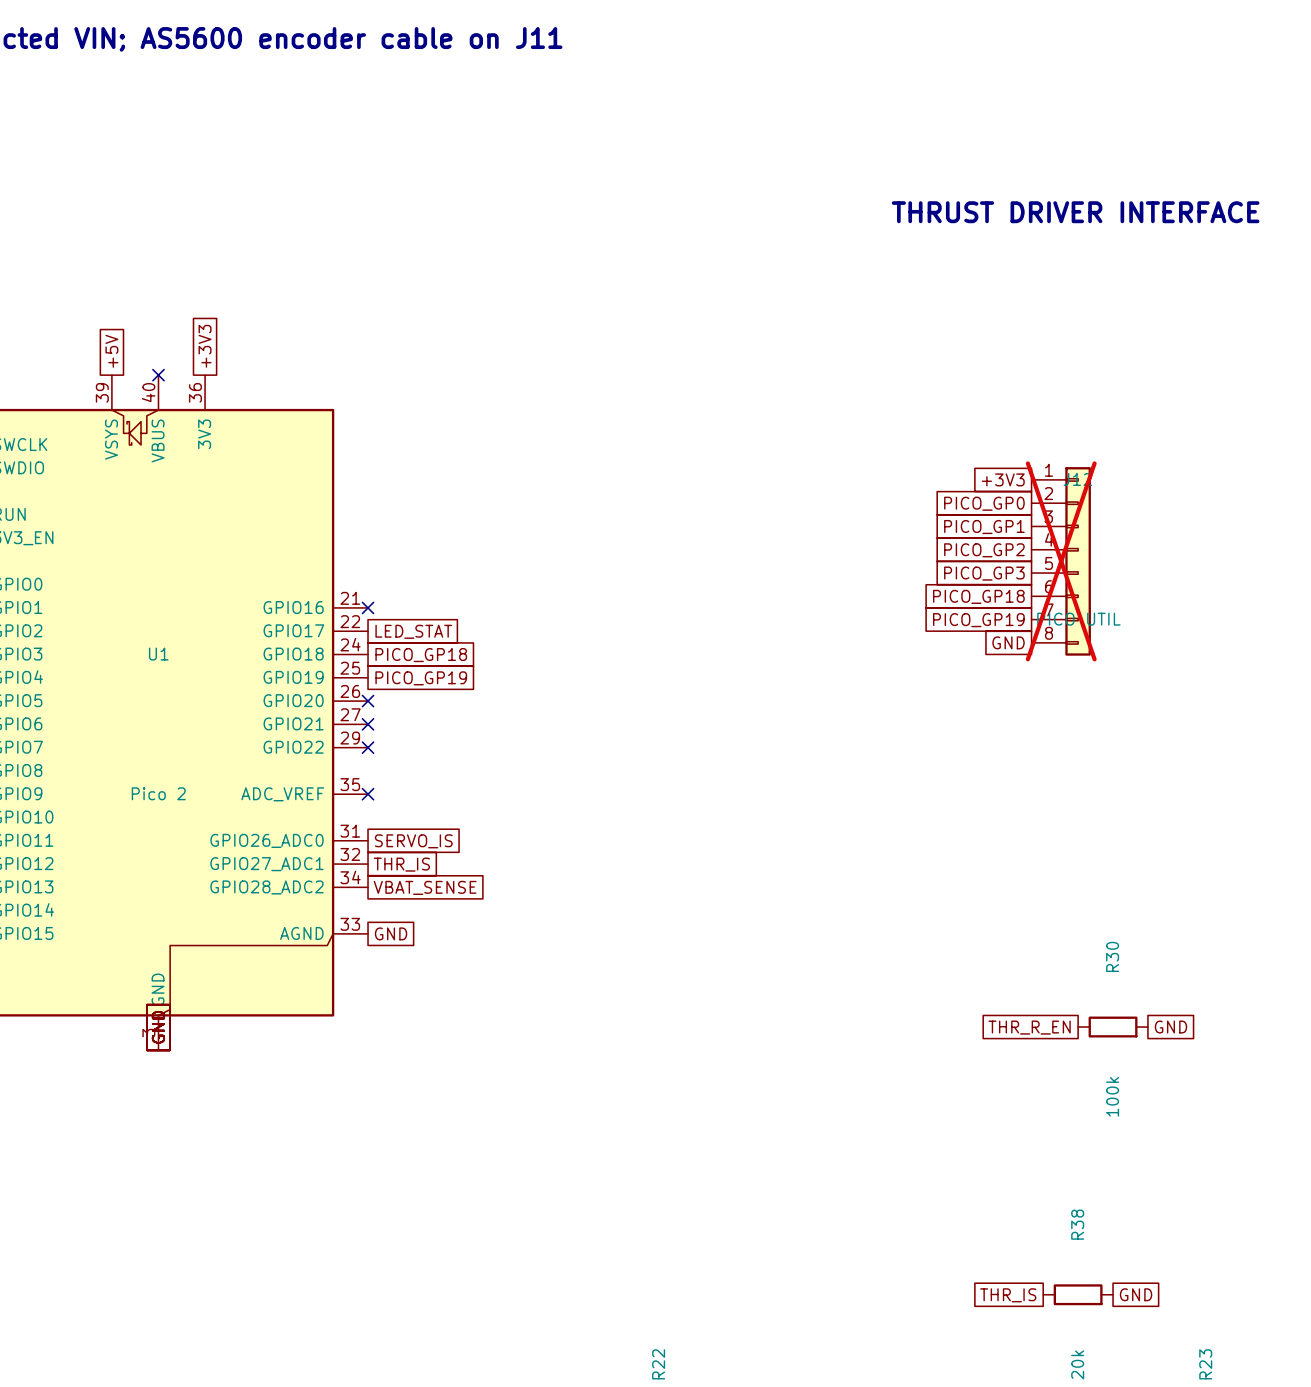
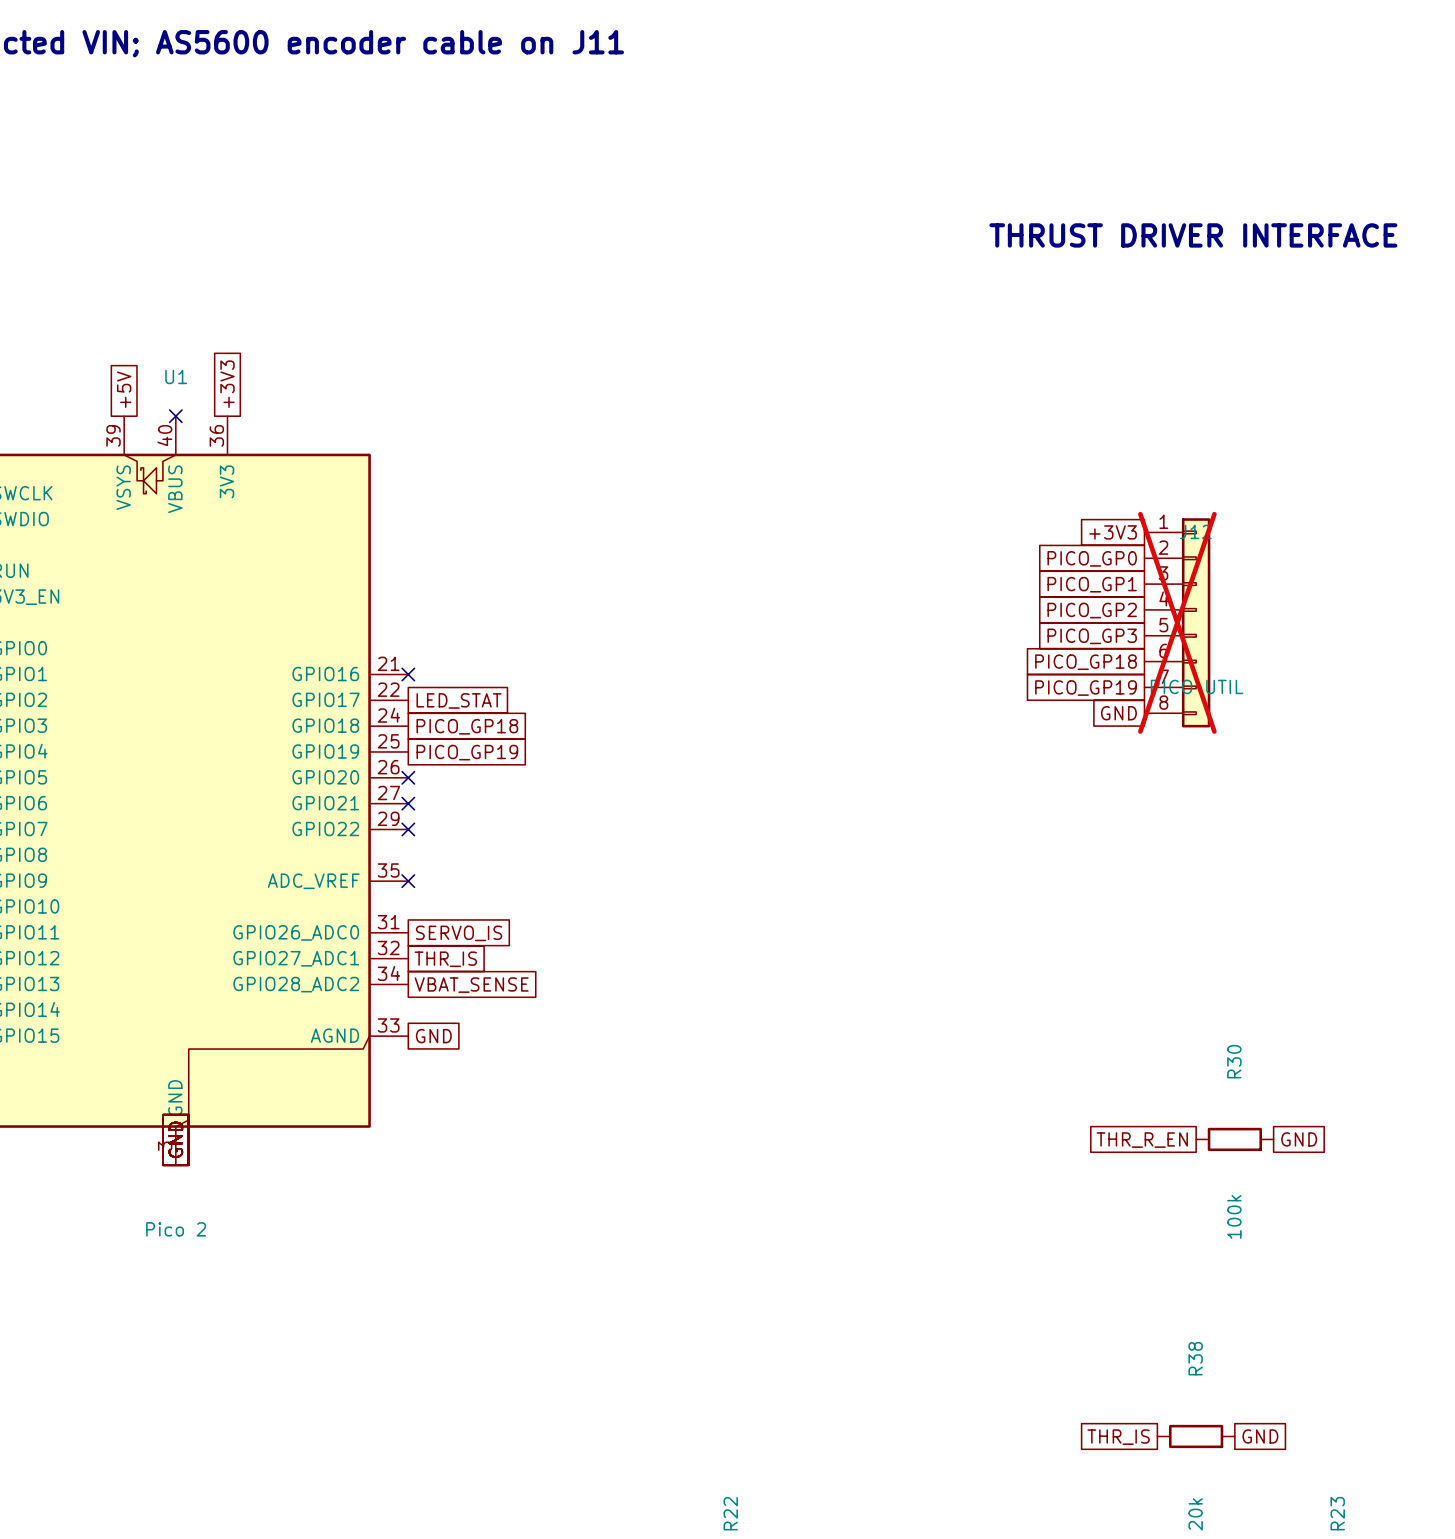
U1 name position: U1 (158, 654) -> U1 (176, 376)
U1 value position: Pico 2 (158, 793) -> Pico 2 (176, 1229)

